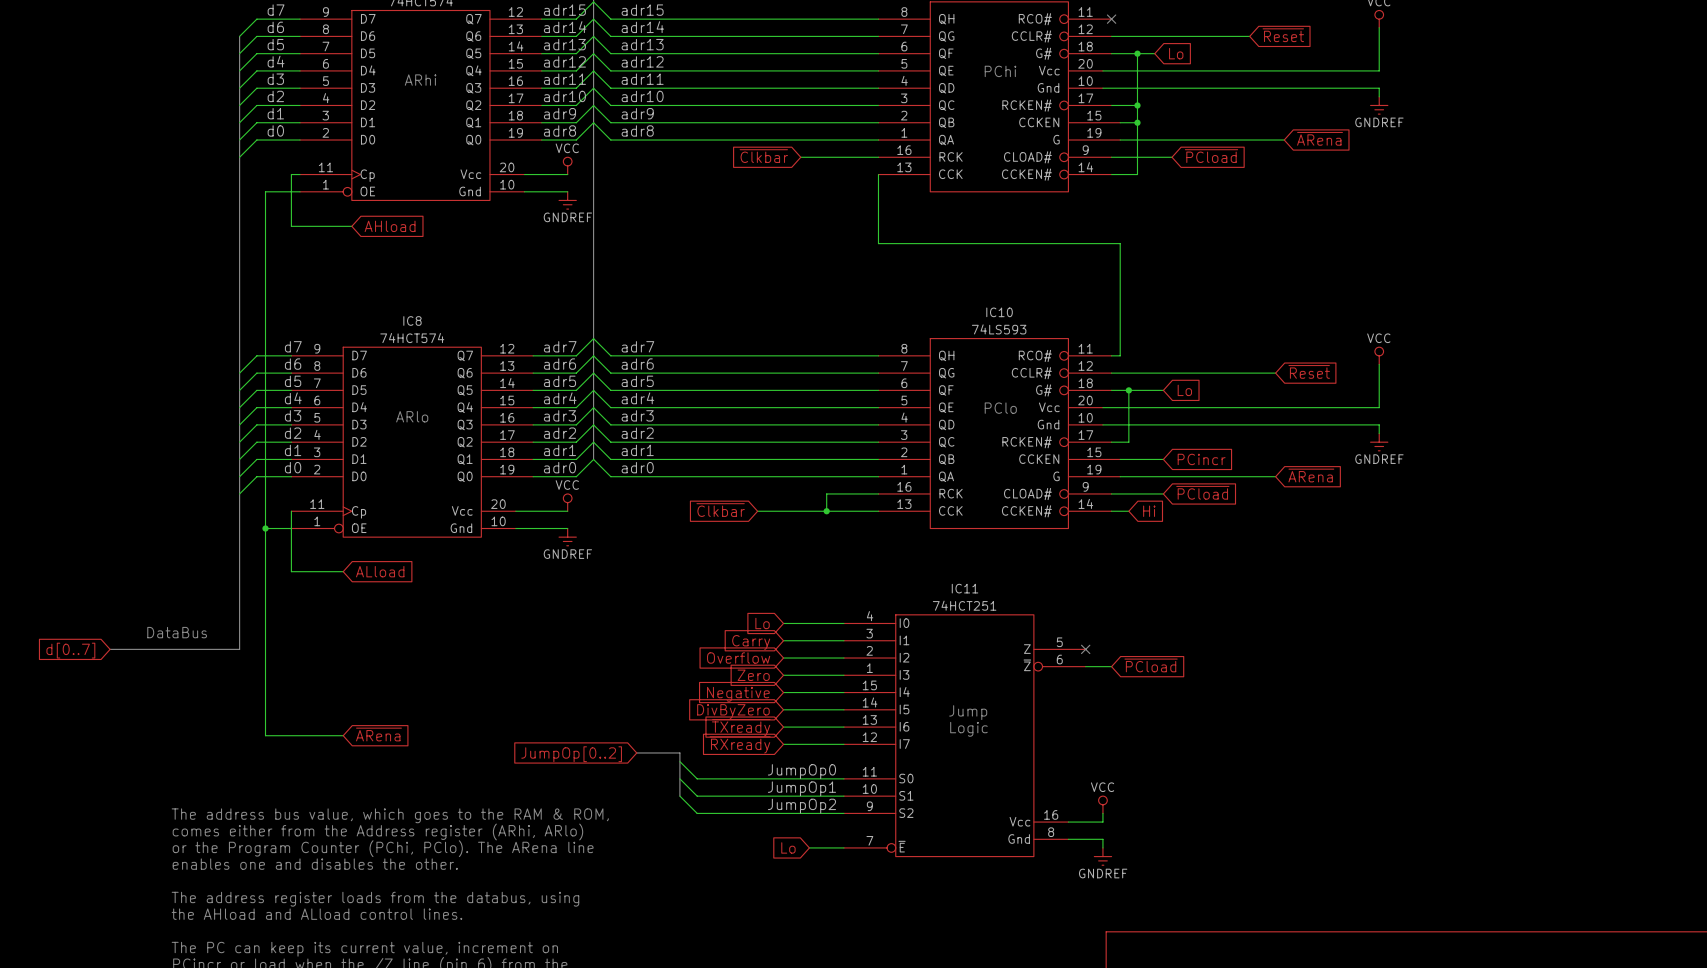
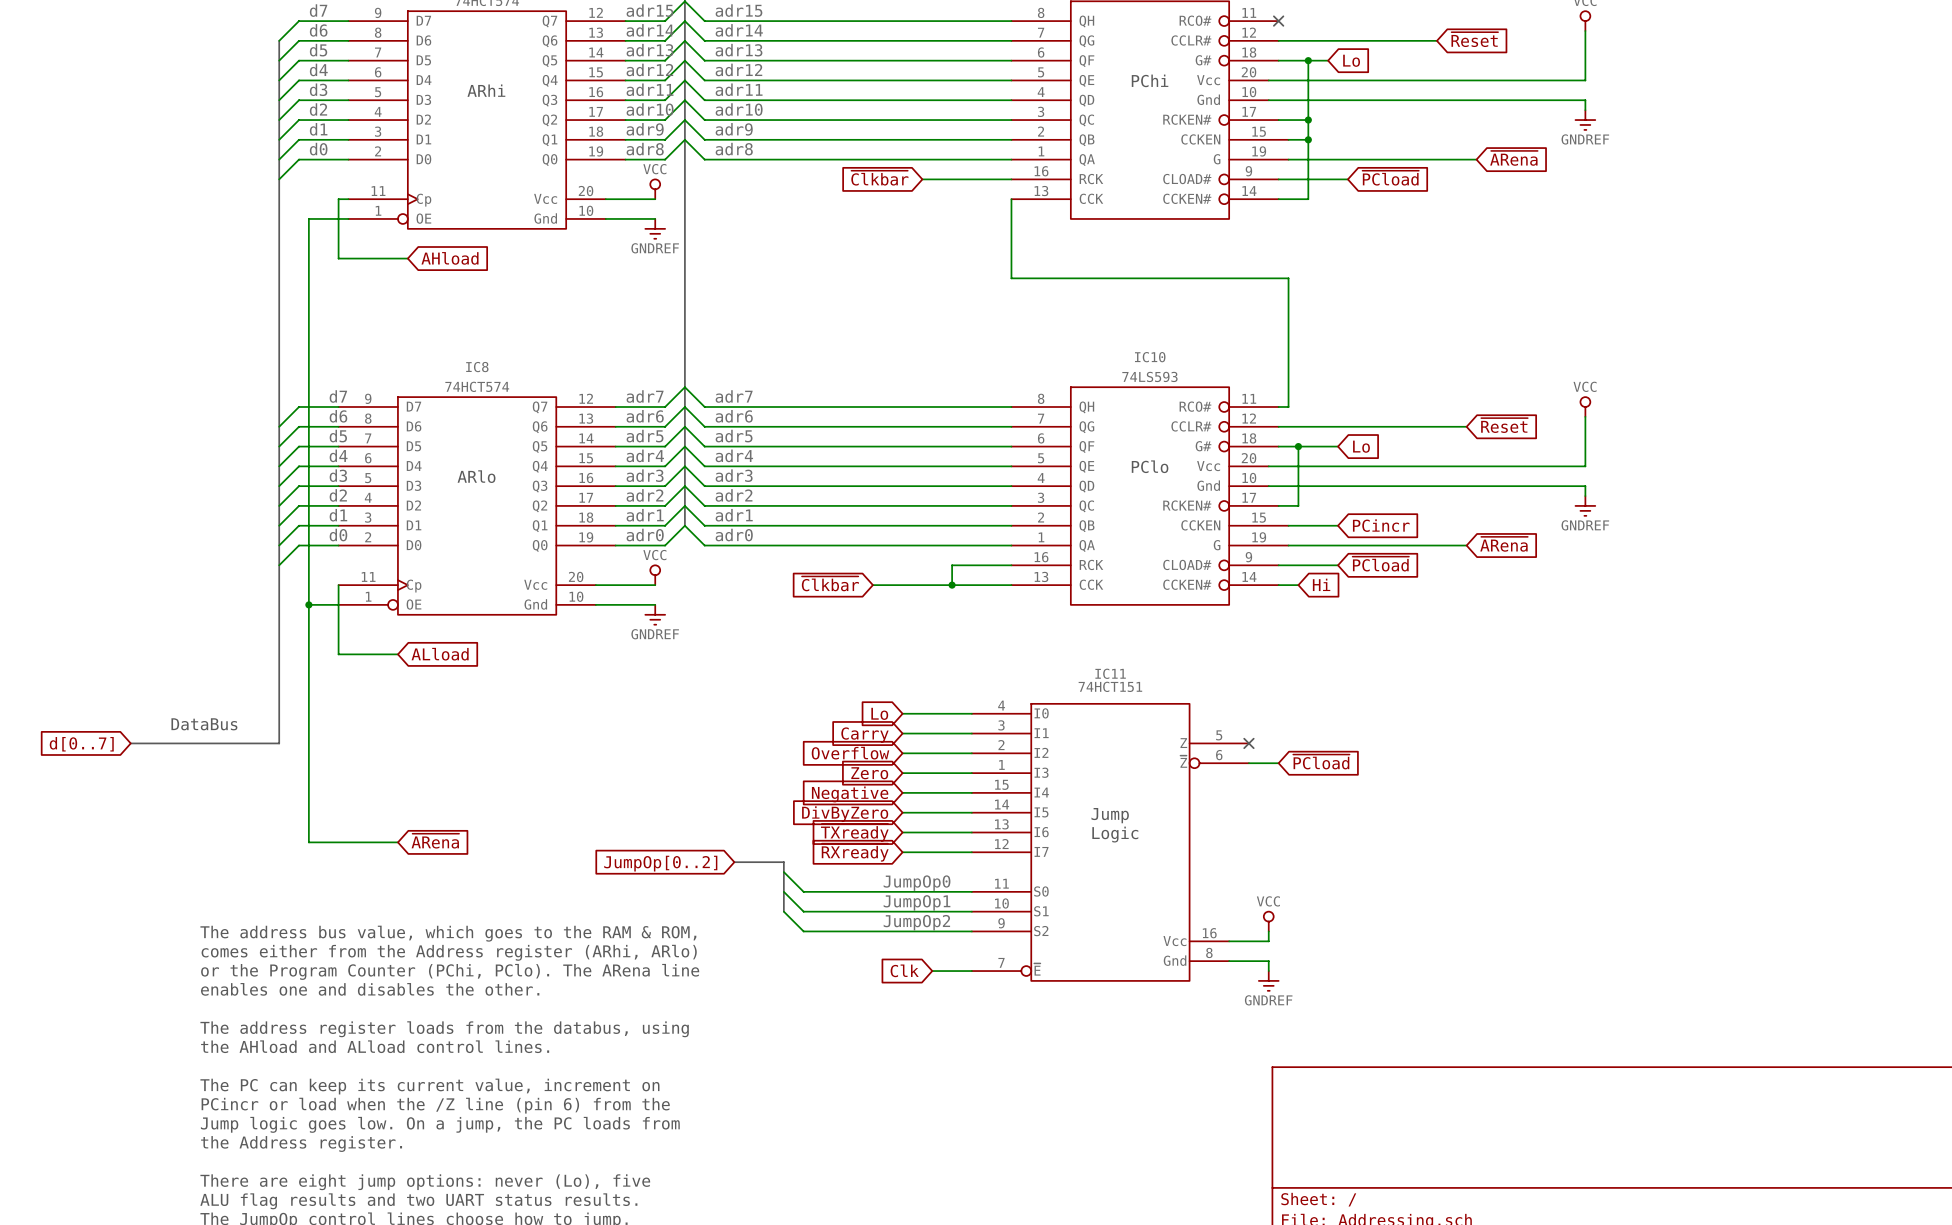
IC11 value: 74HCT251 (964, 605) -> 74HCT151 (1110, 686)
global label: Lo (788, 847) -> Clk (904, 970)

